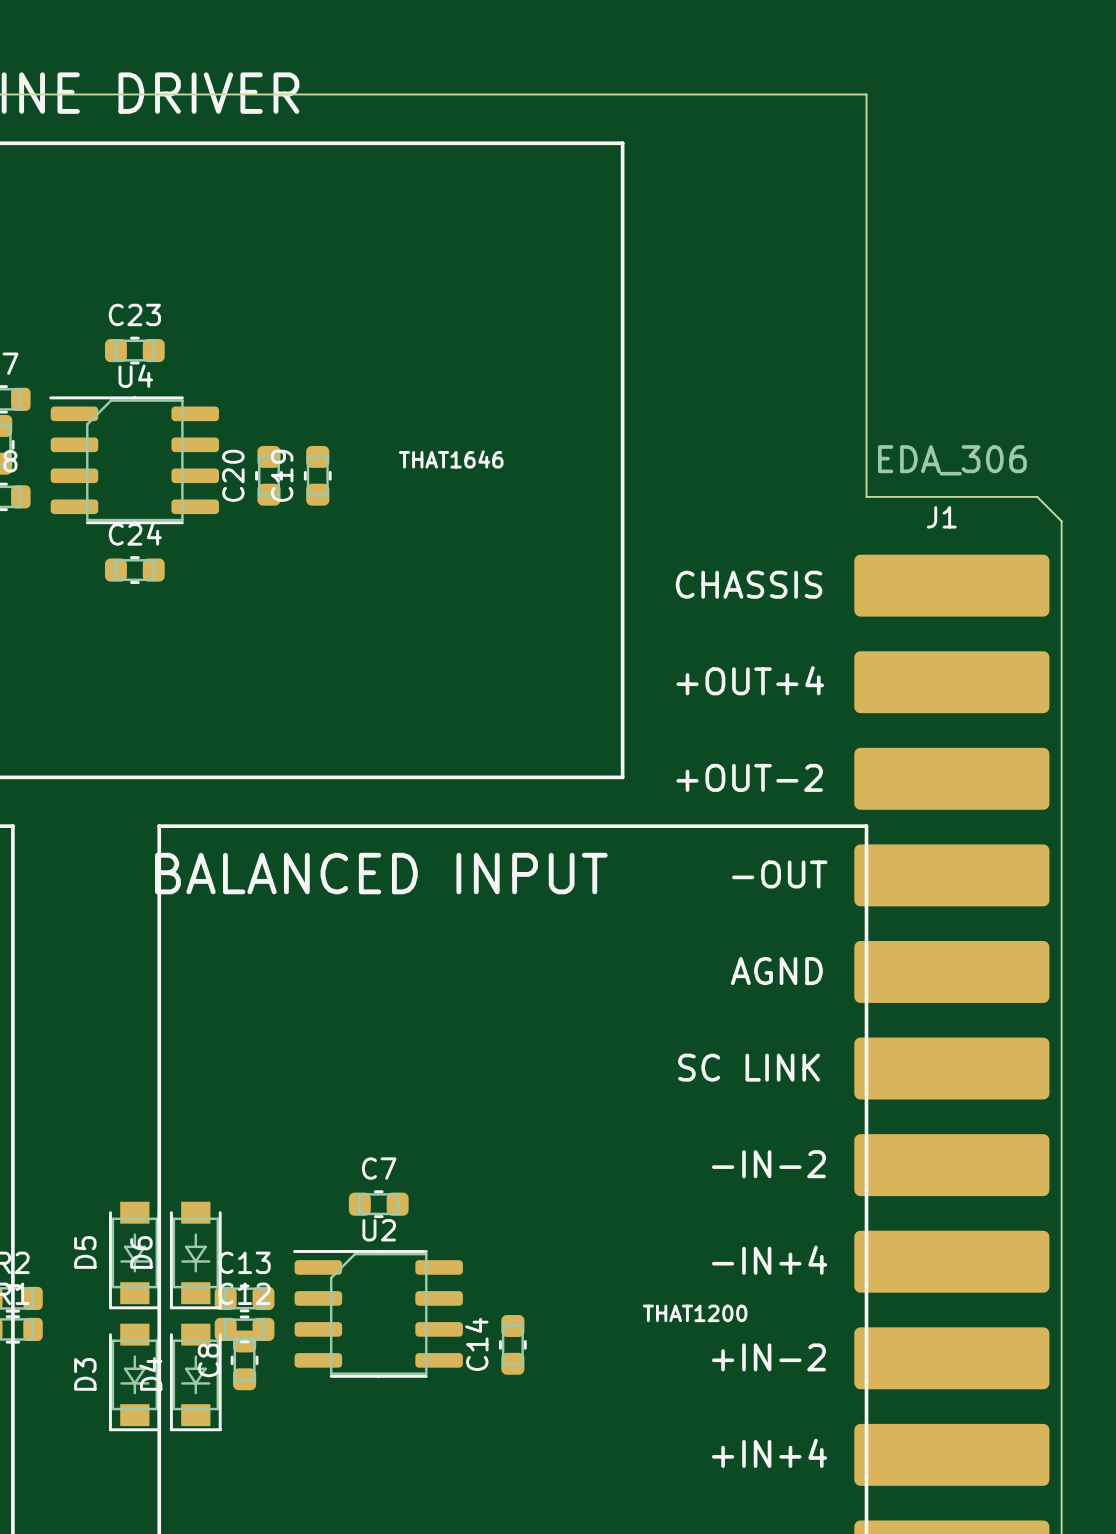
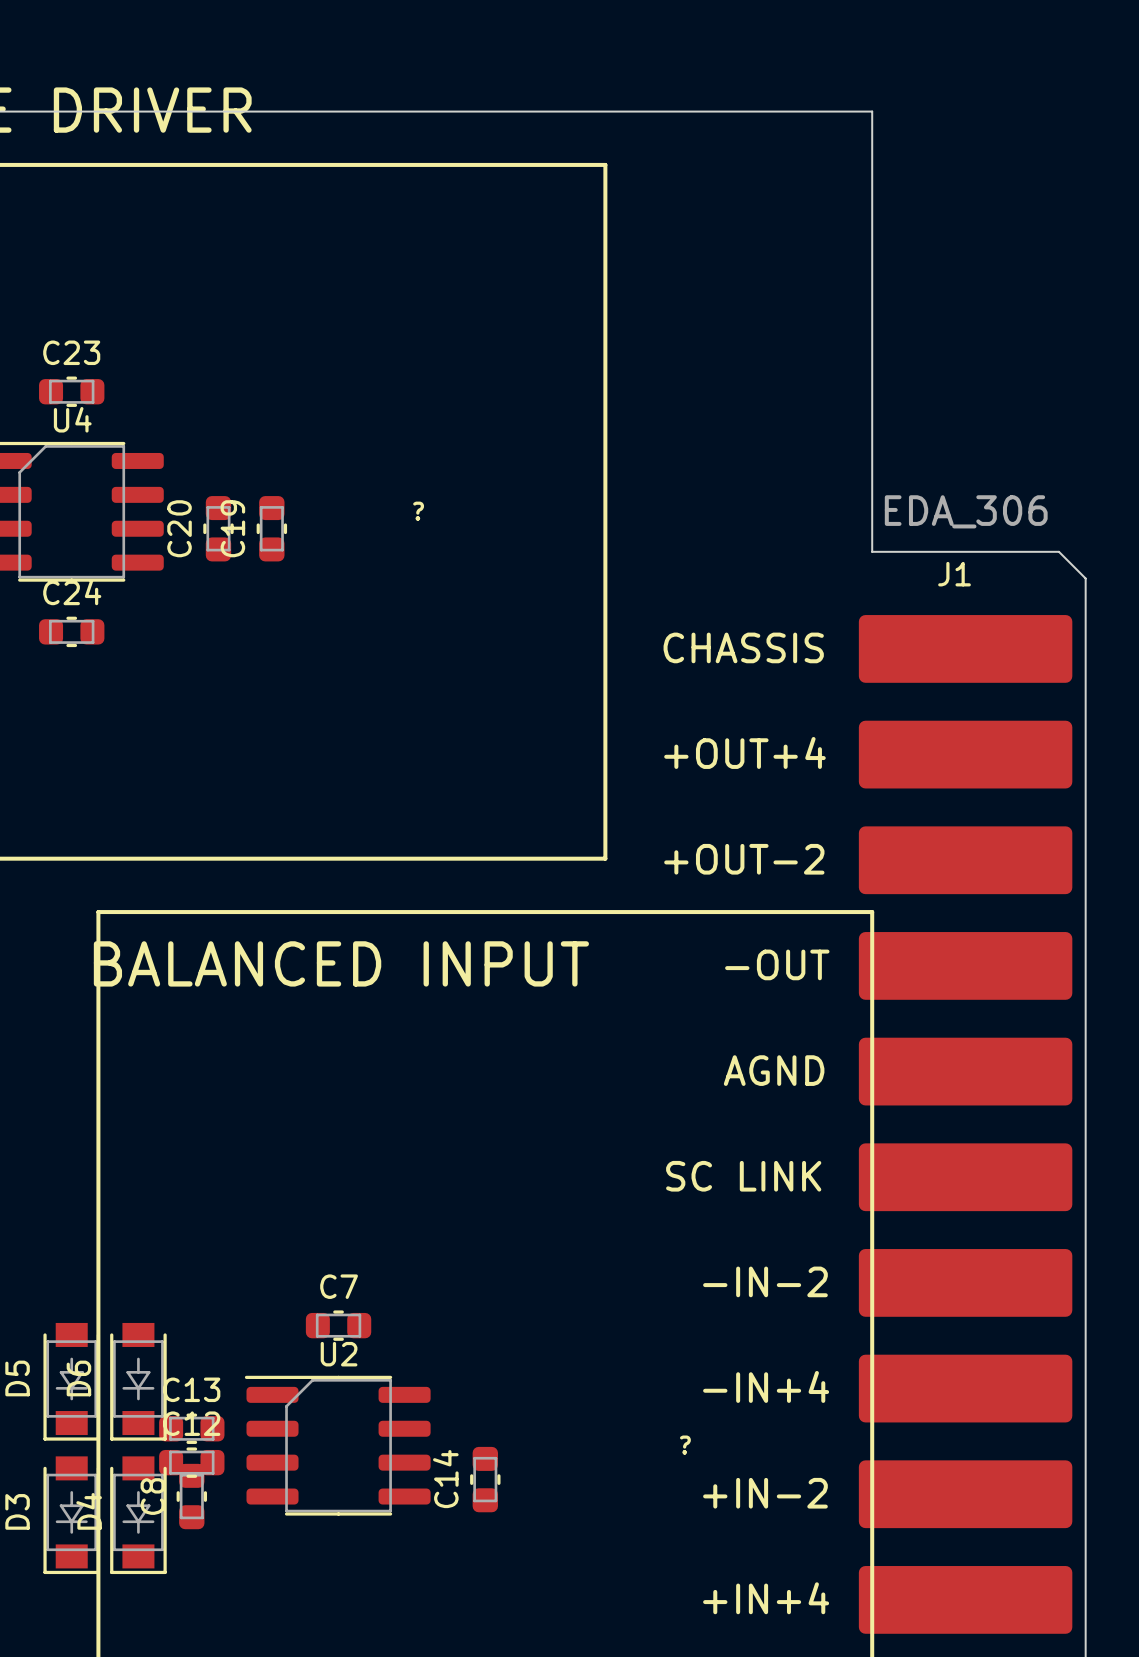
U4 value: THAT1646 (451, 459) -> ? (418, 511)
U2 value: THAT1200 (695, 1313) -> ? (685, 1445)

